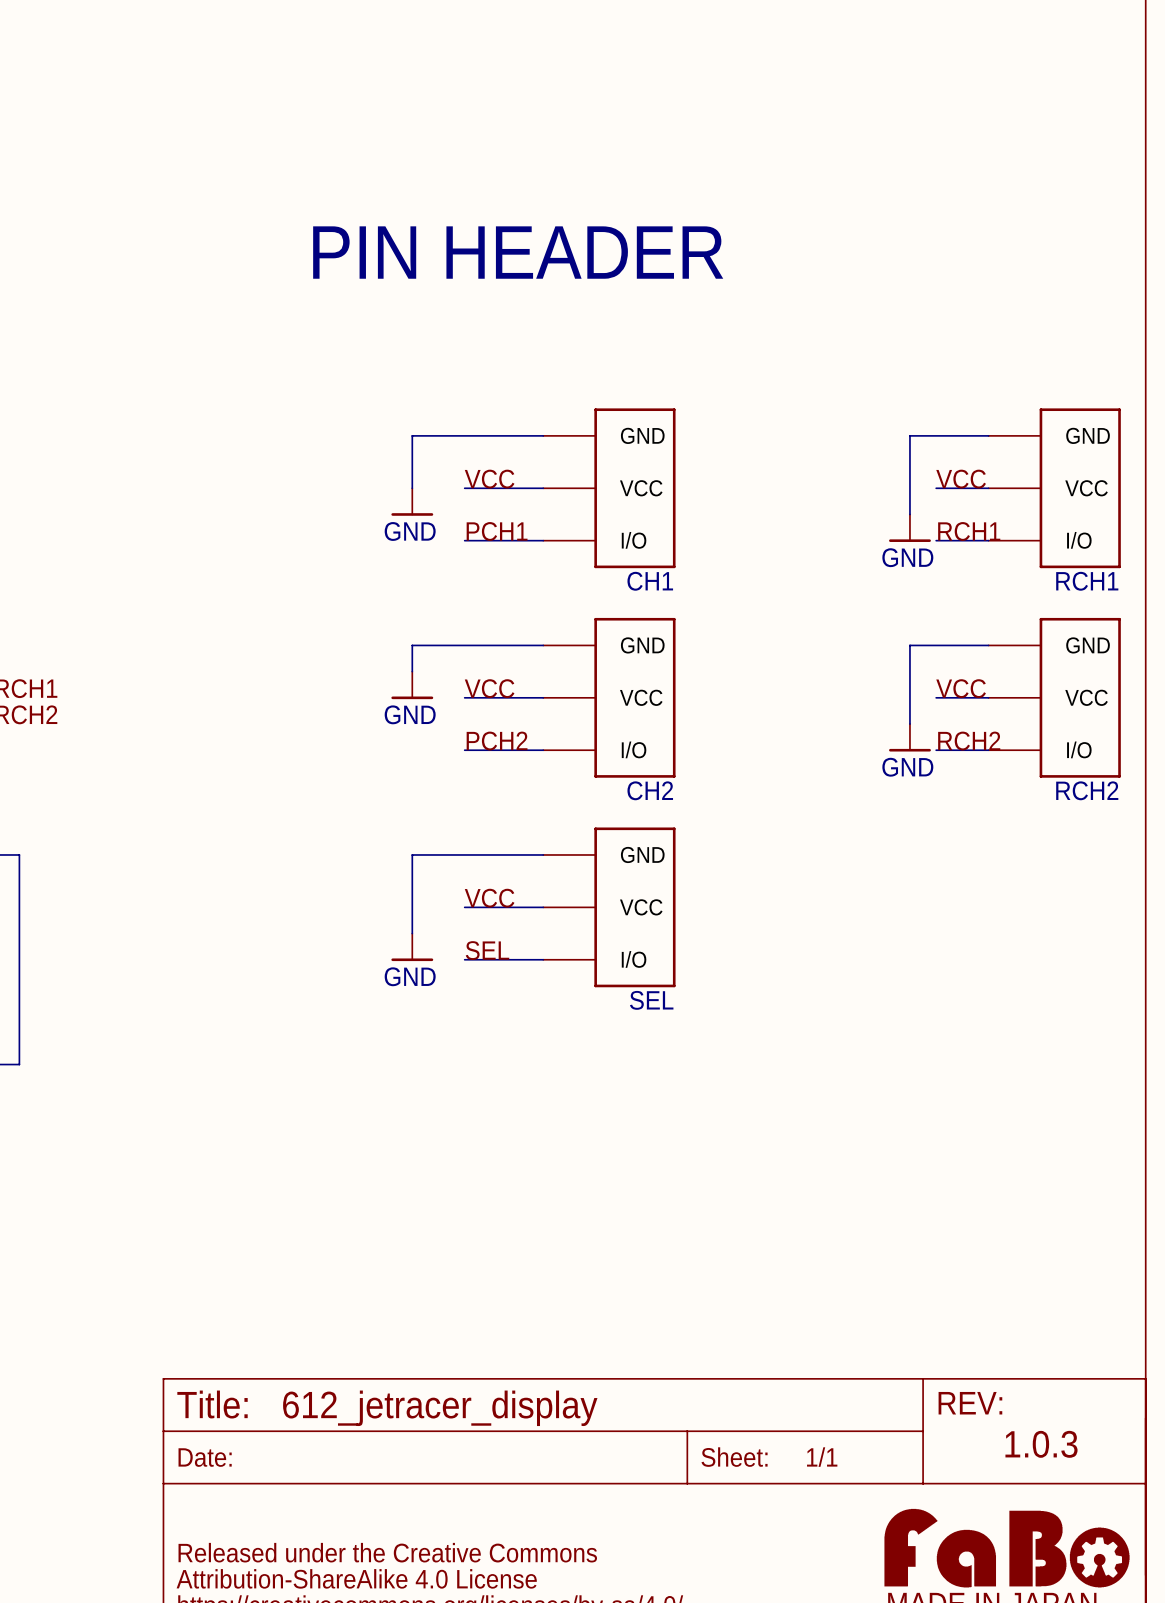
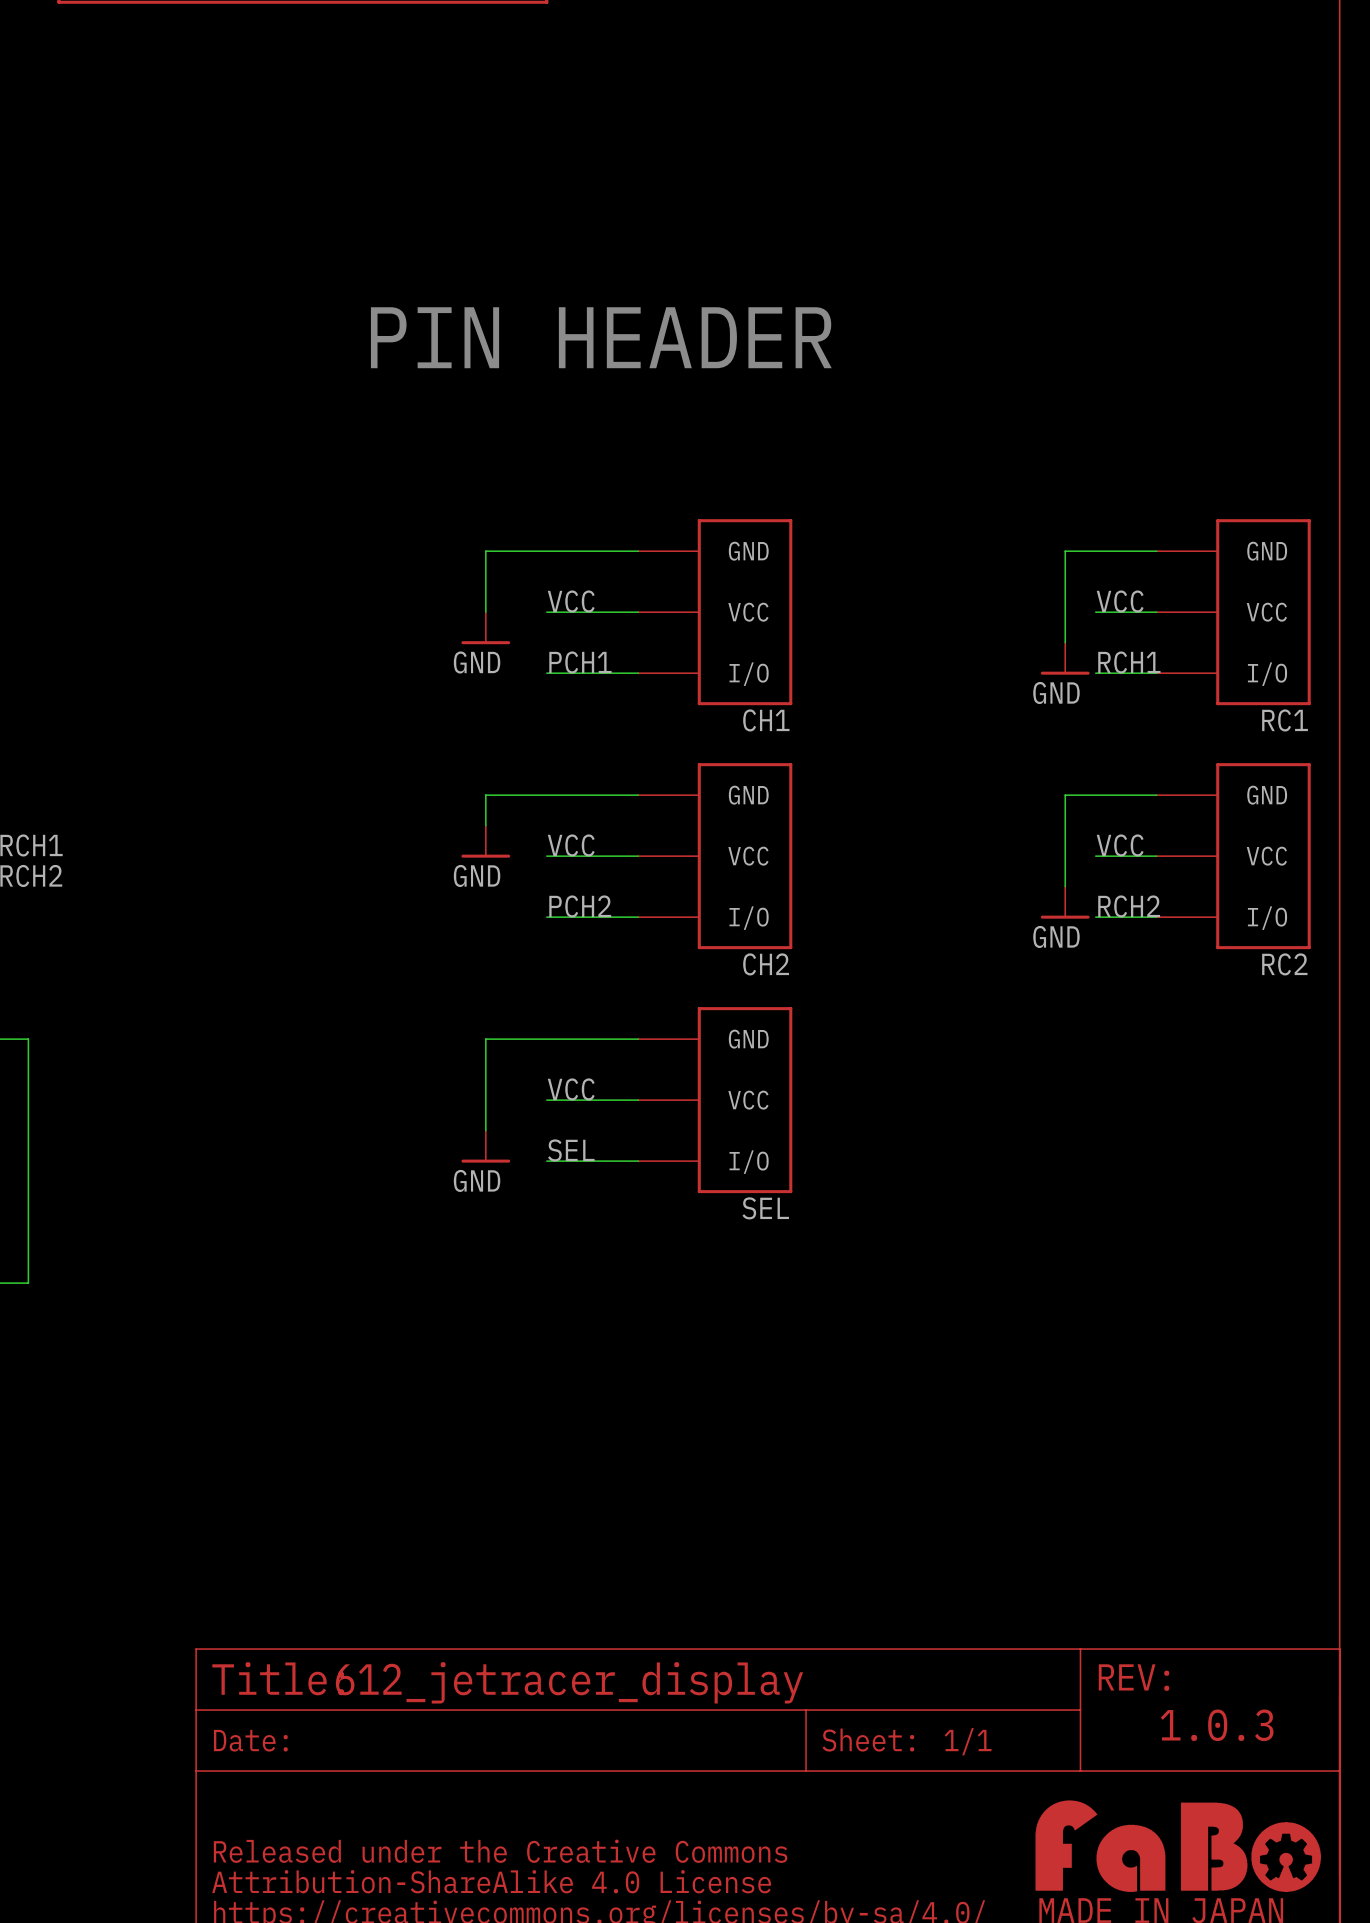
RCH1 name: RCH1 (1087, 581) -> RC1 (1285, 720)
RCH2 name: RCH2 (1087, 790) -> RC2 (1284, 964)

